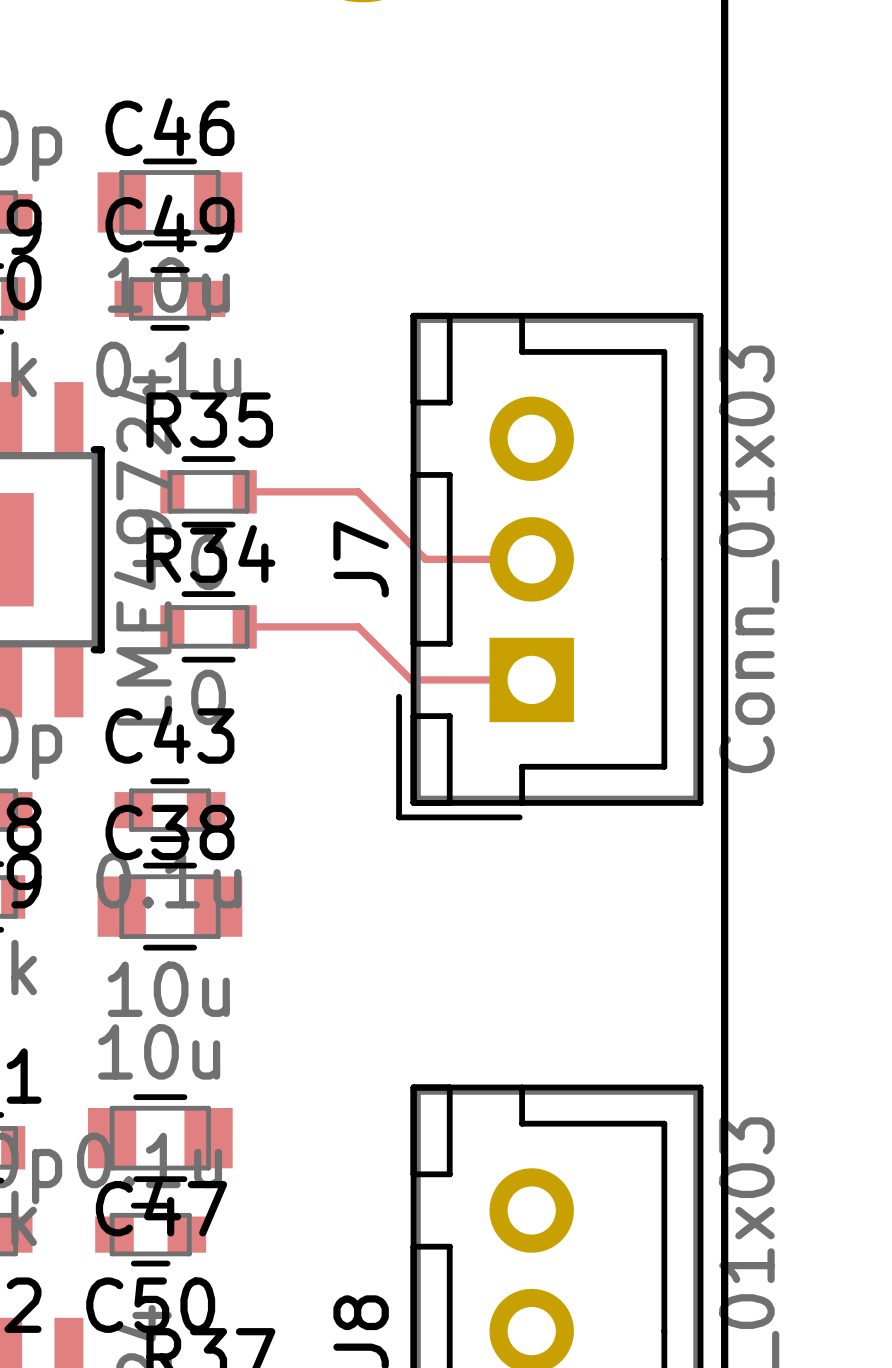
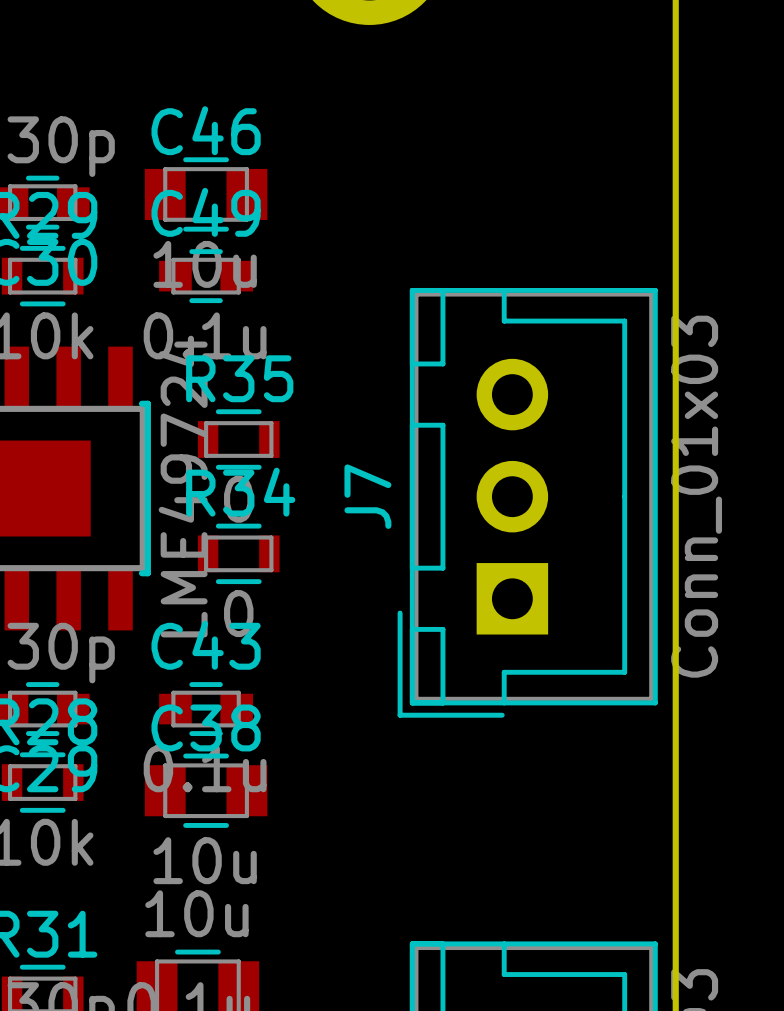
track: (244, 491) (358, 491) (425, 559) (531, 559) -> none
track: (244, 626) (358, 626) (411, 679) (531, 679) -> none

